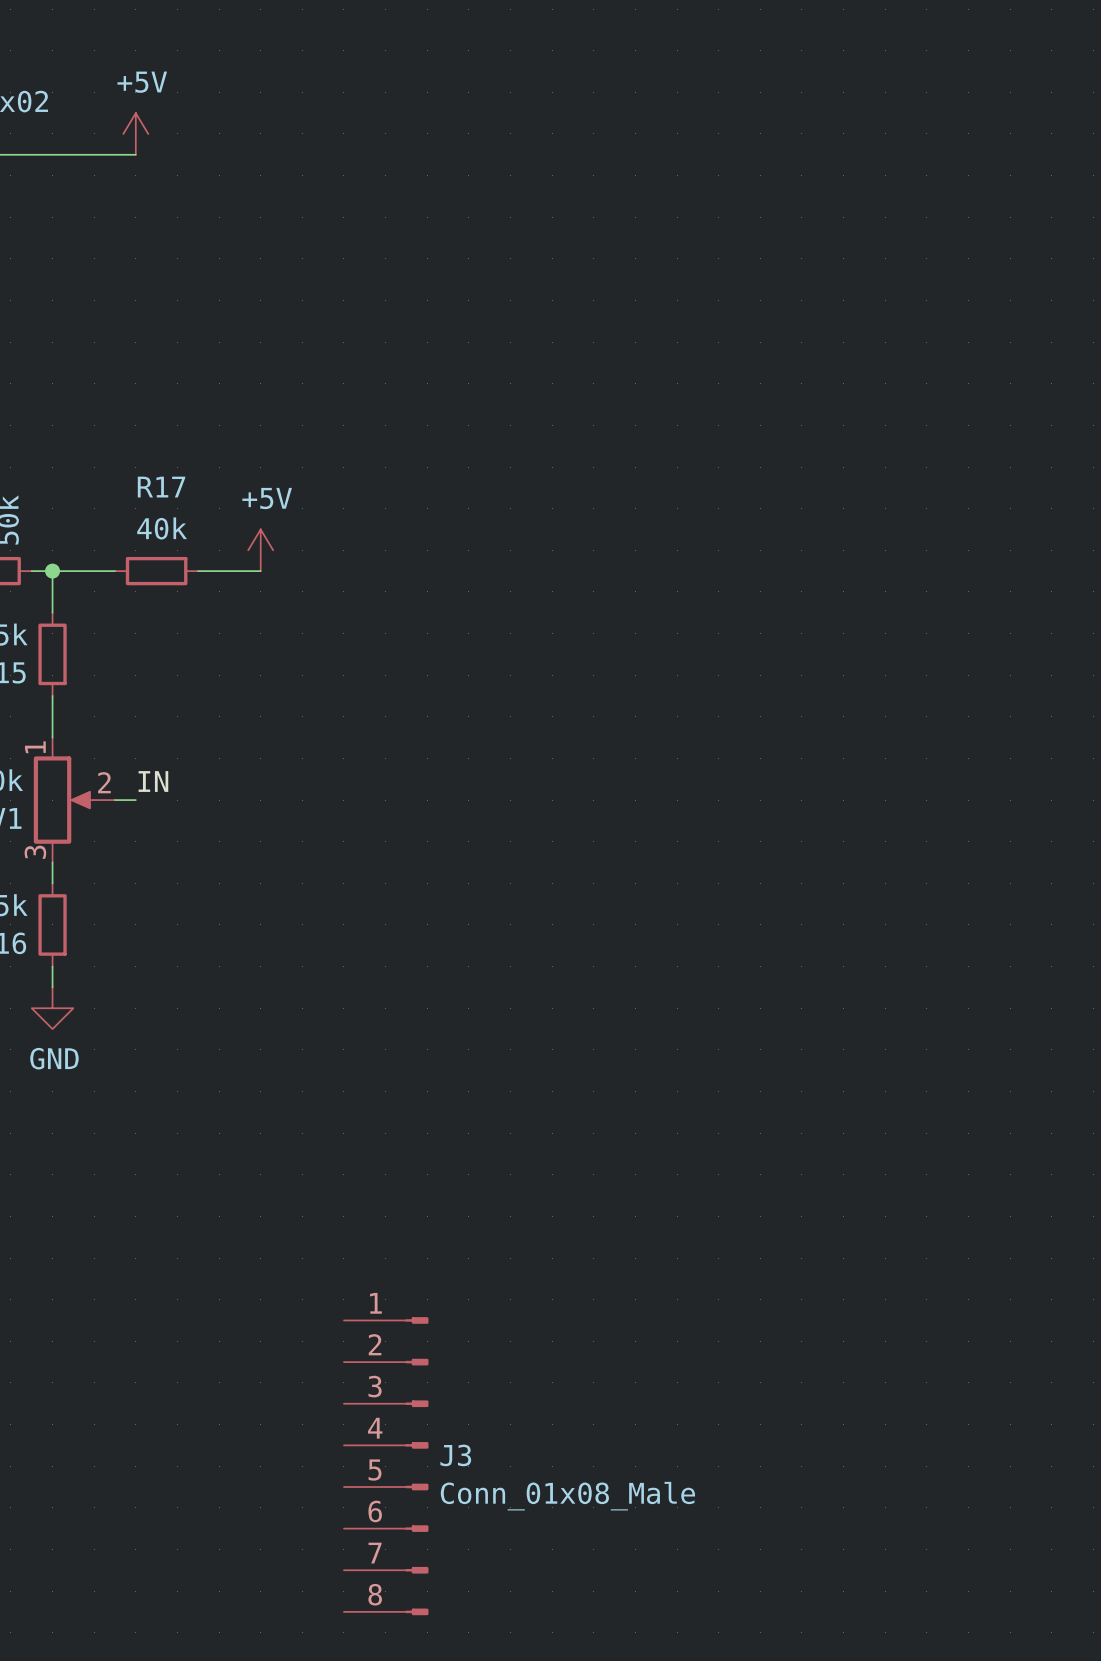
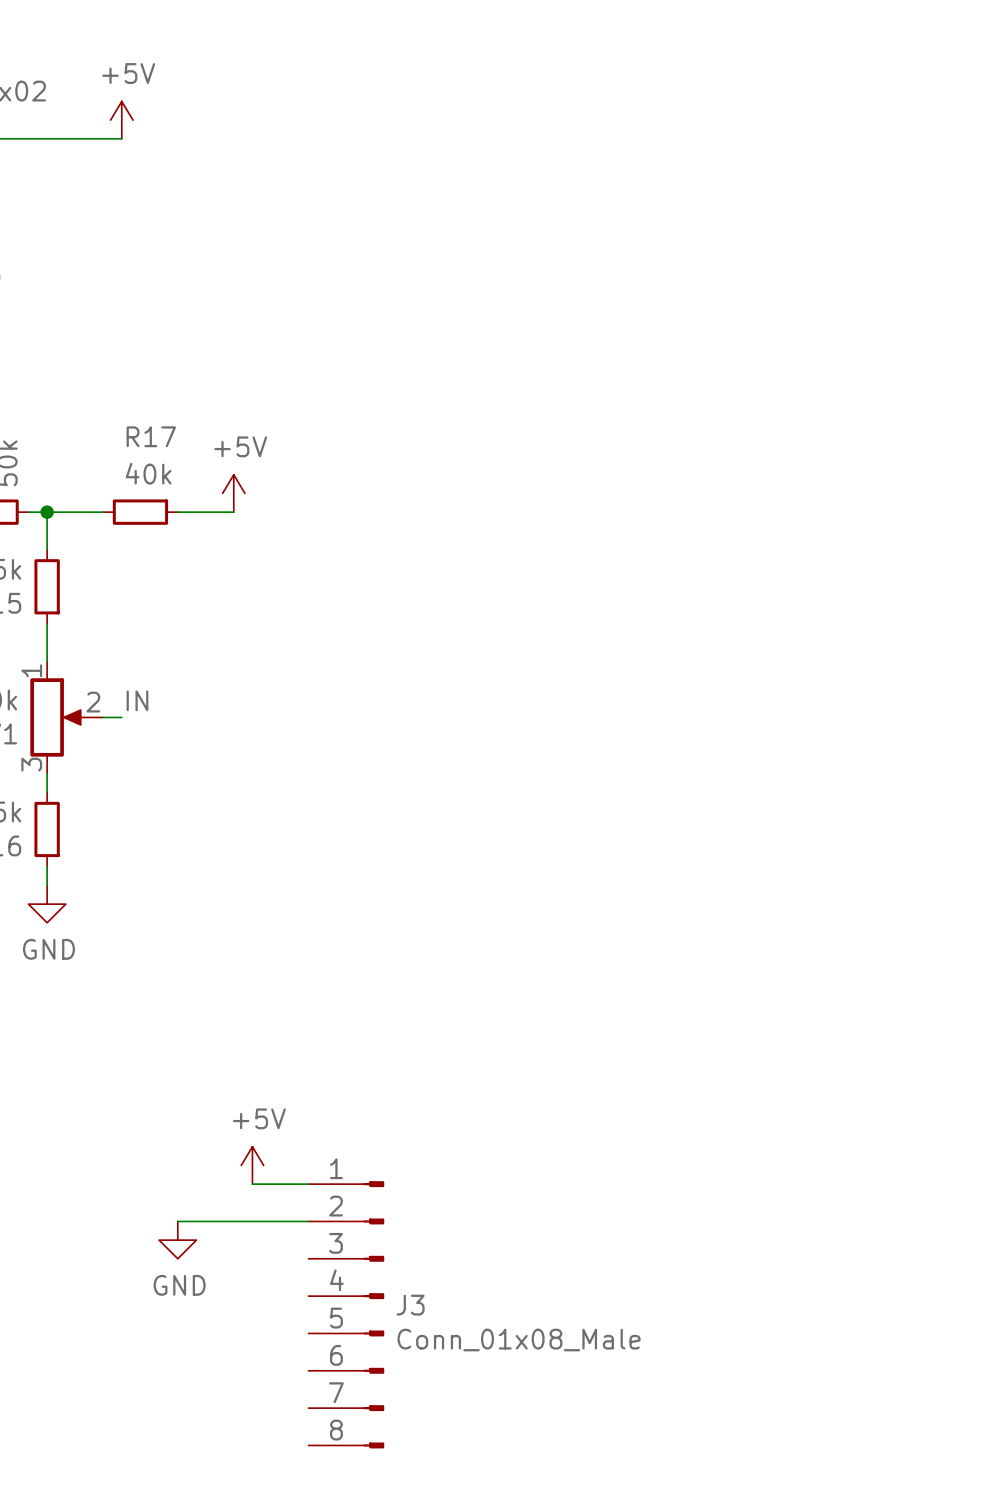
power symbol: none -> +5V (252, 1165)
wire: none -> (252, 1184) (308, 1184)
wire: none -> (177, 1221) (308, 1221)
power symbol: none -> GND (177, 1240)

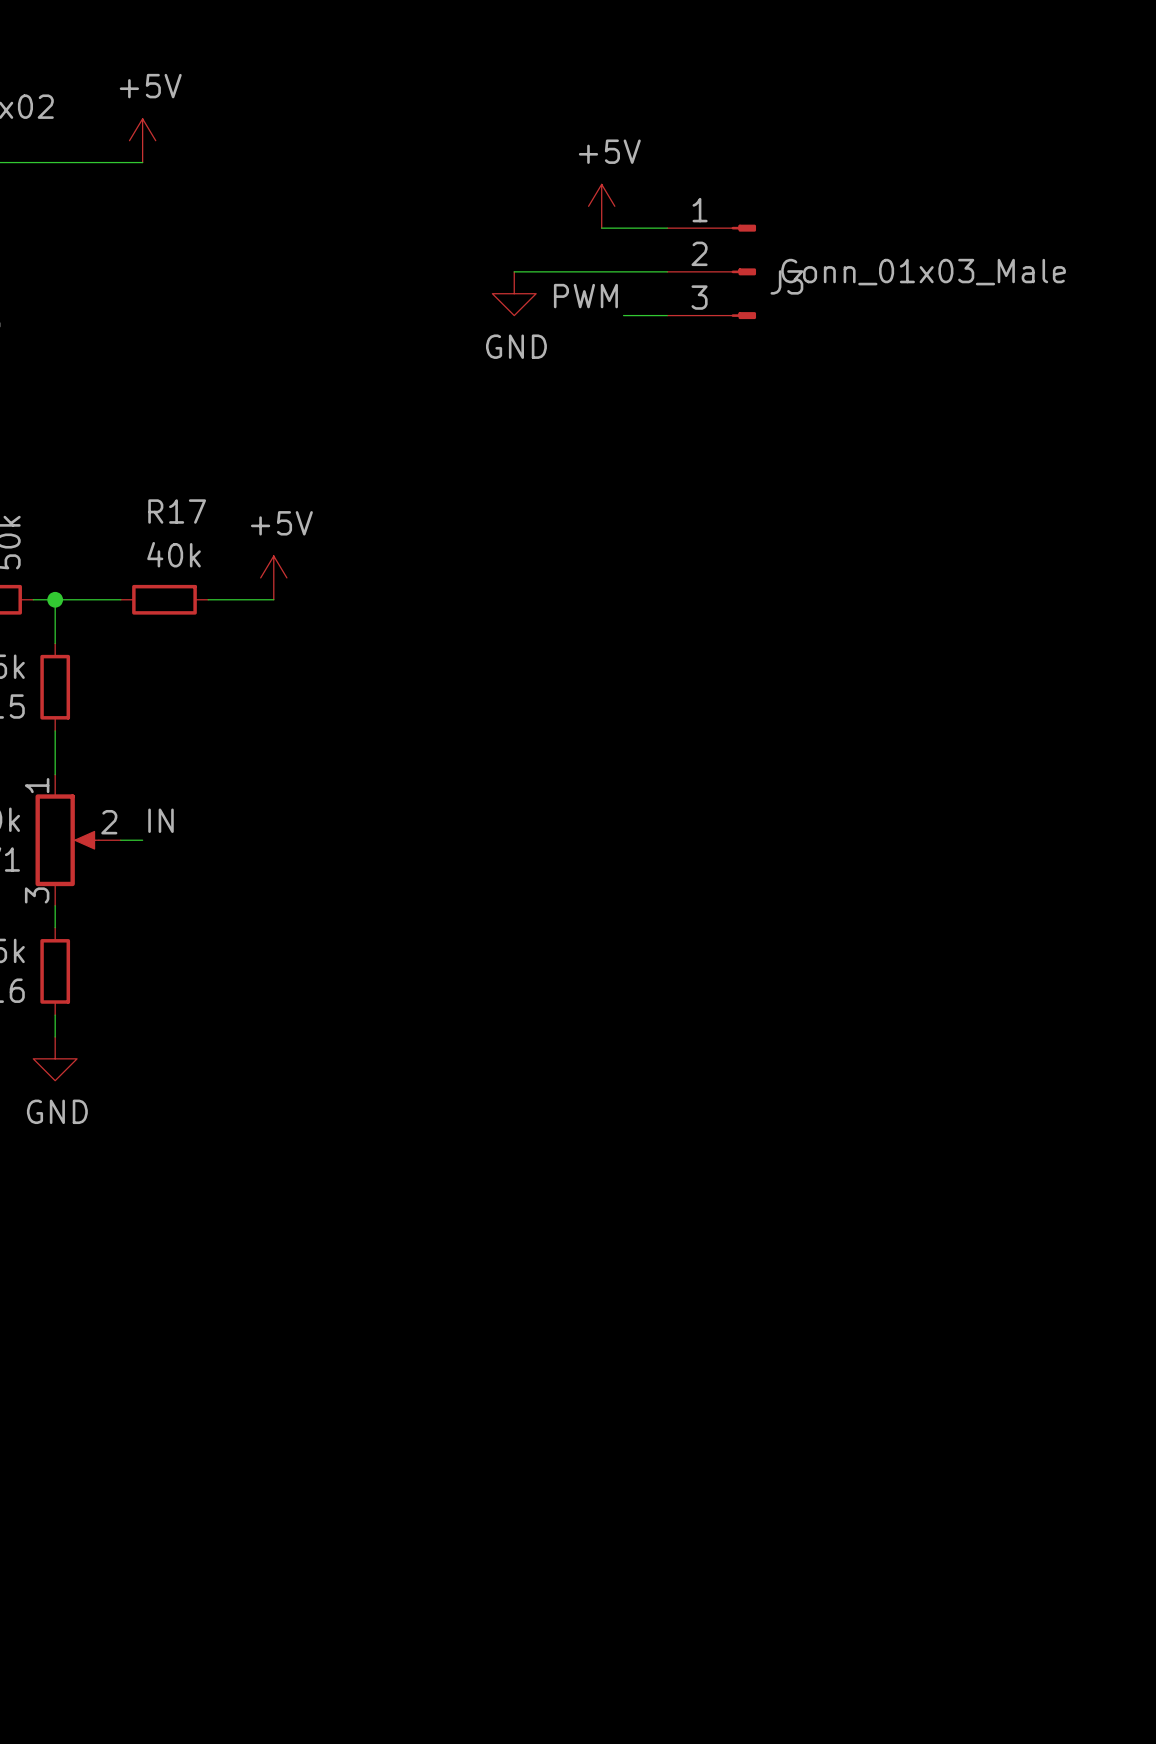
power symbol: none -> +5V (601, 206)
wire: none -> (601, 228) (667, 228)
wire: none -> (514, 271) (667, 271)
power symbol: none -> GND (514, 293)
label: none -> PWM (585, 296)
wire: none -> (623, 315) (667, 315)
power symbol: +5V (252, 1165) -> none
J3 symbol: [308, 1181, 385, 1449] -> [667, 224, 757, 320]
wire: (252, 1184) (308, 1184) -> none
wire: (177, 1221) (308, 1221) -> none
power symbol: GND (177, 1240) -> none
J3 value: Conn_01x08_Male (519, 1340) -> Conn_01x03_Male (923, 272)

